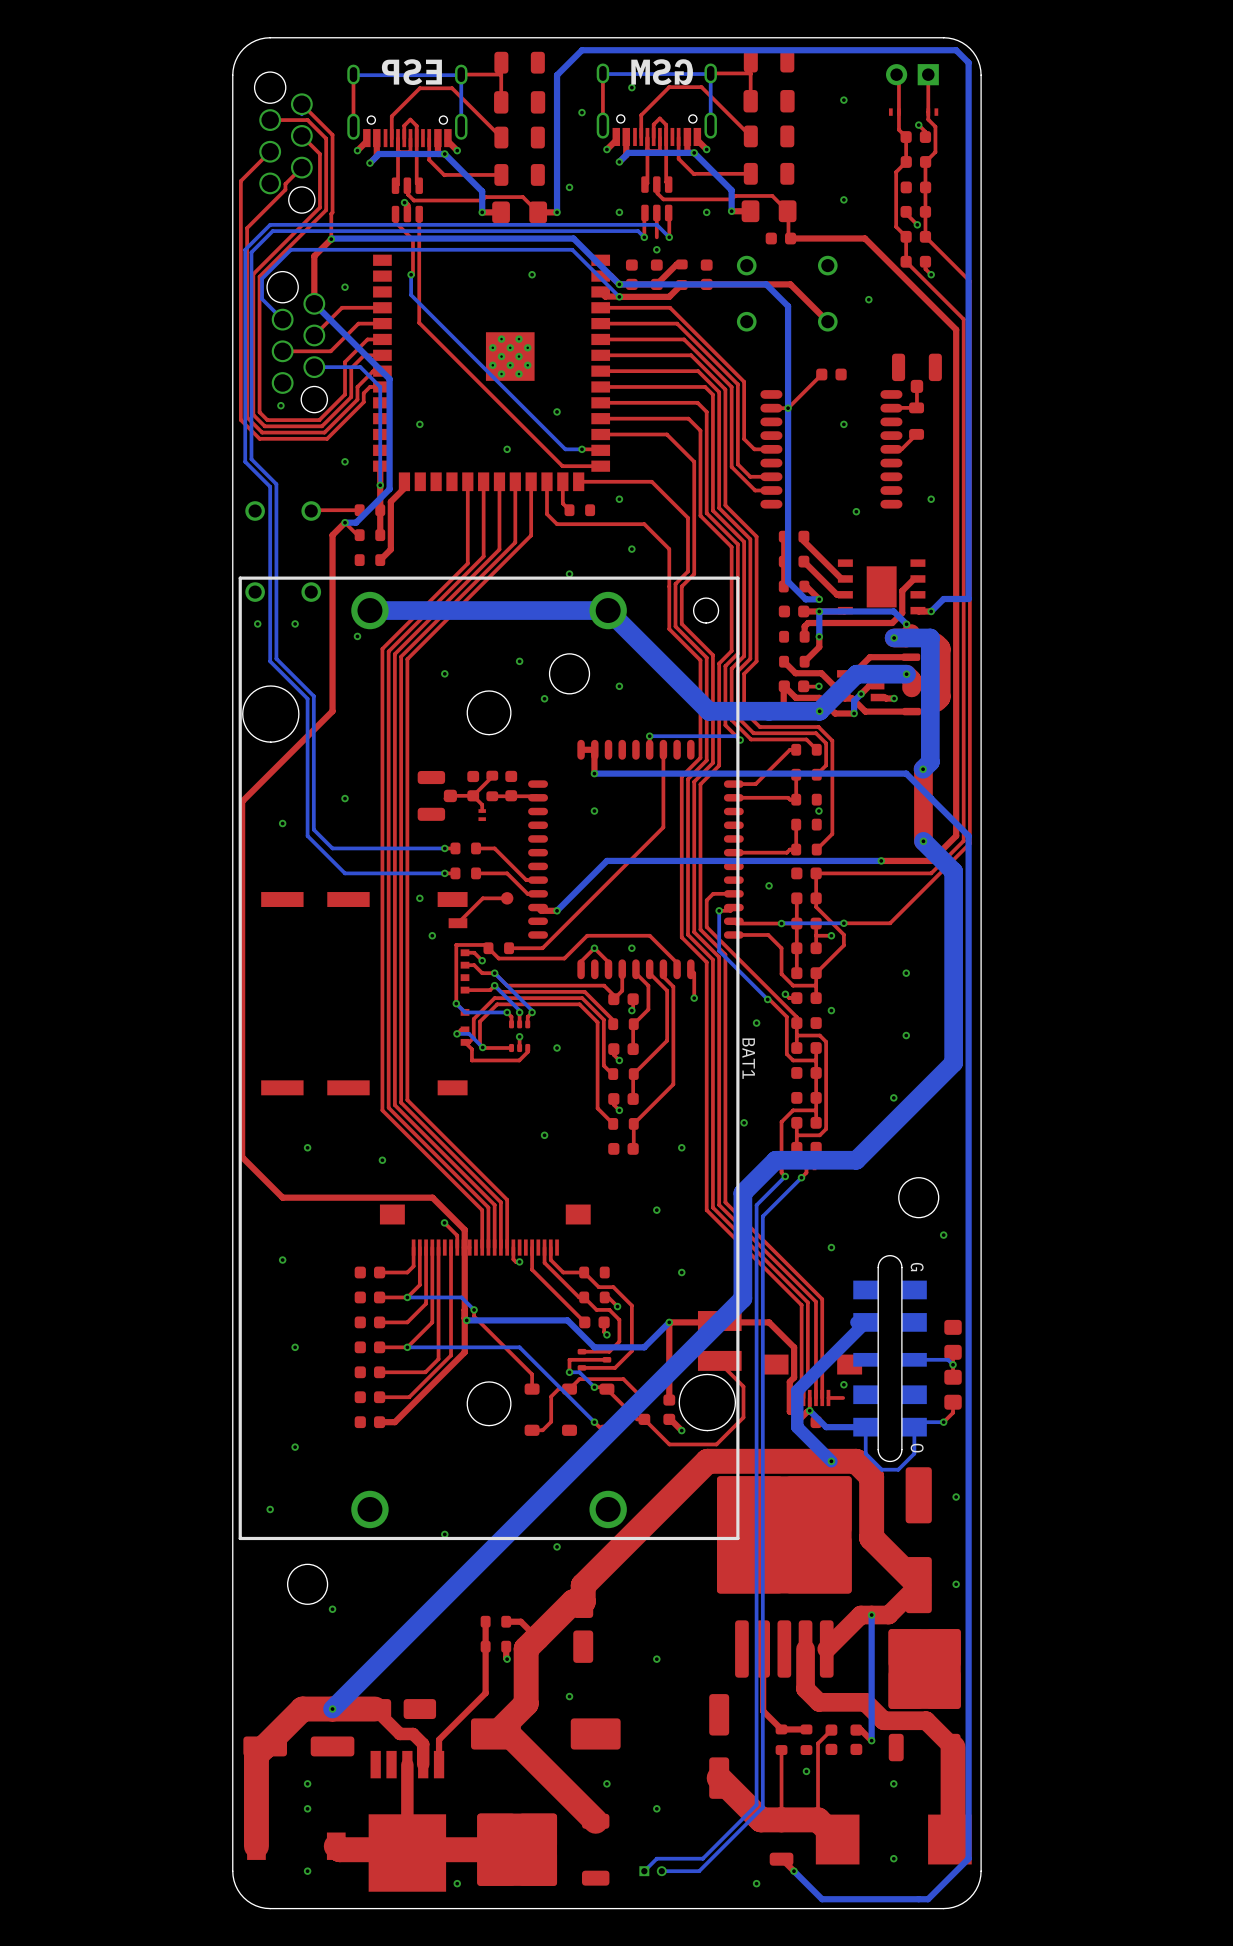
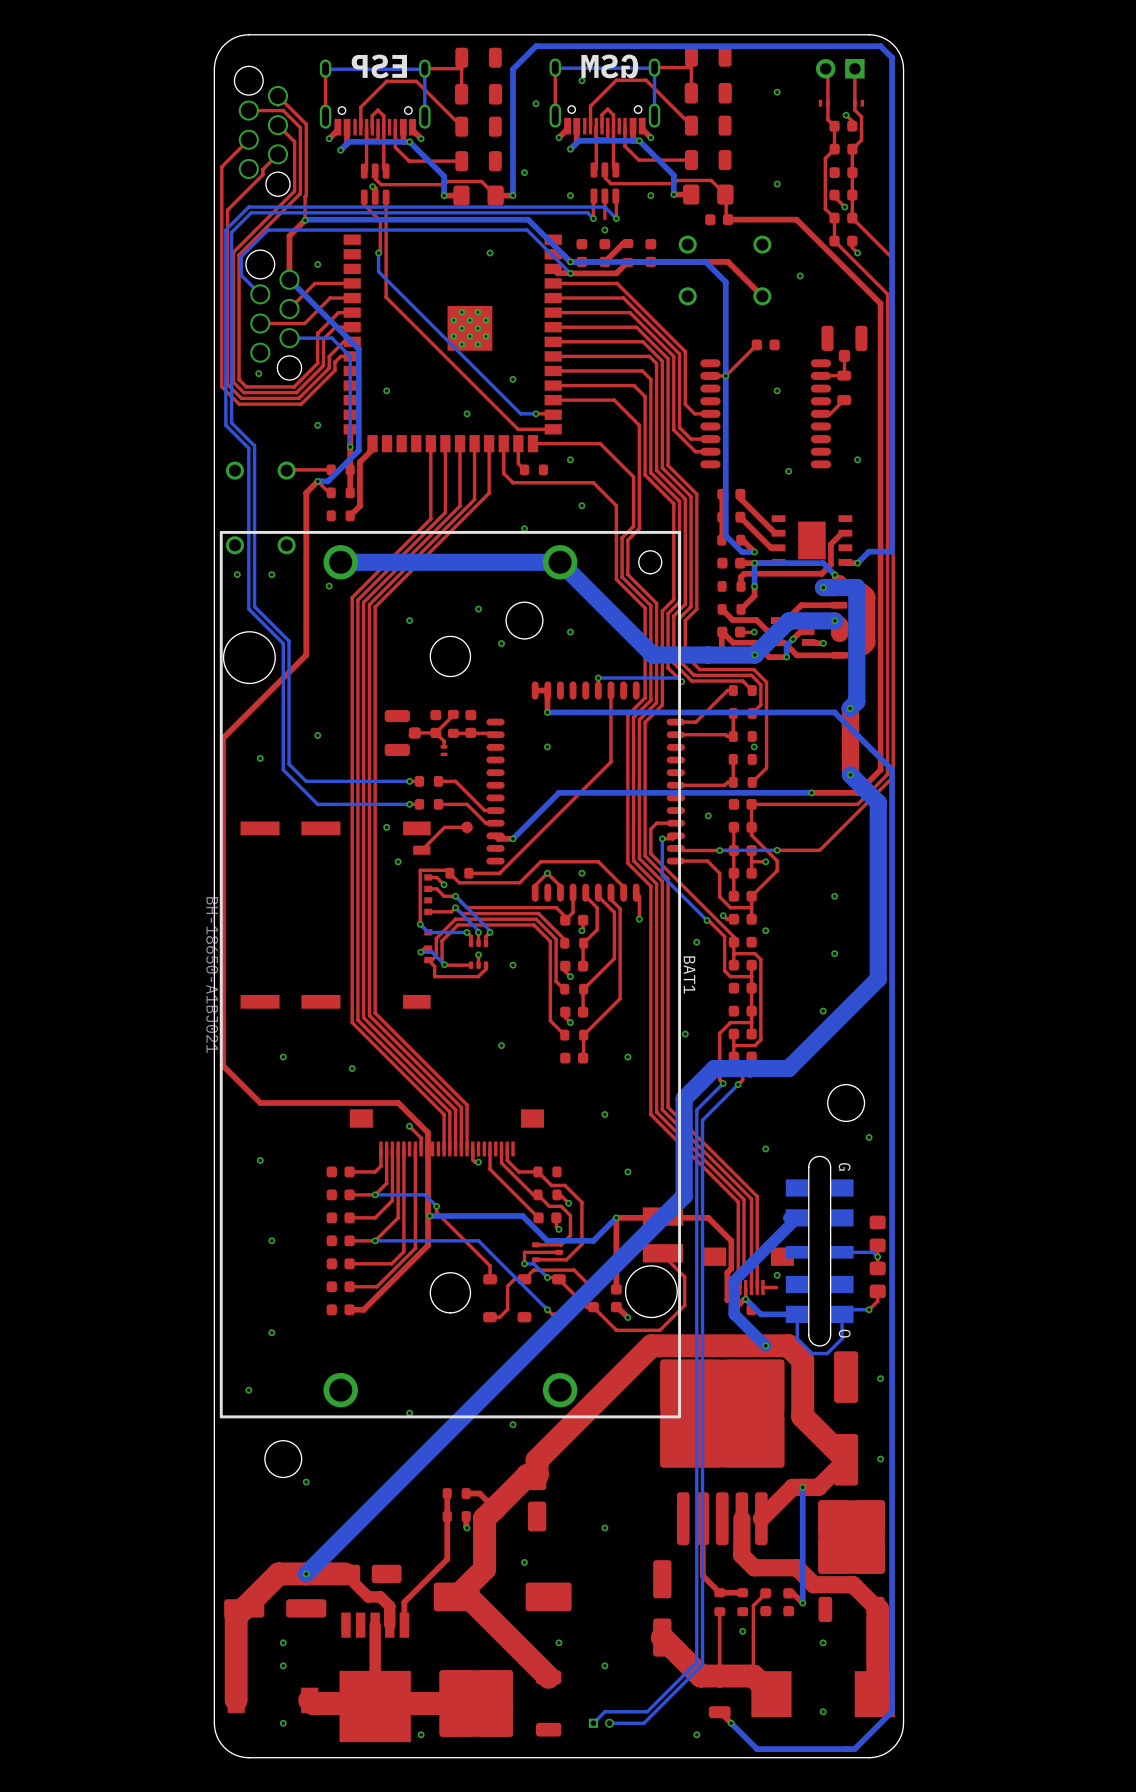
BAT1 value: none -> BH-18650-A1BJ021 (212, 974)

